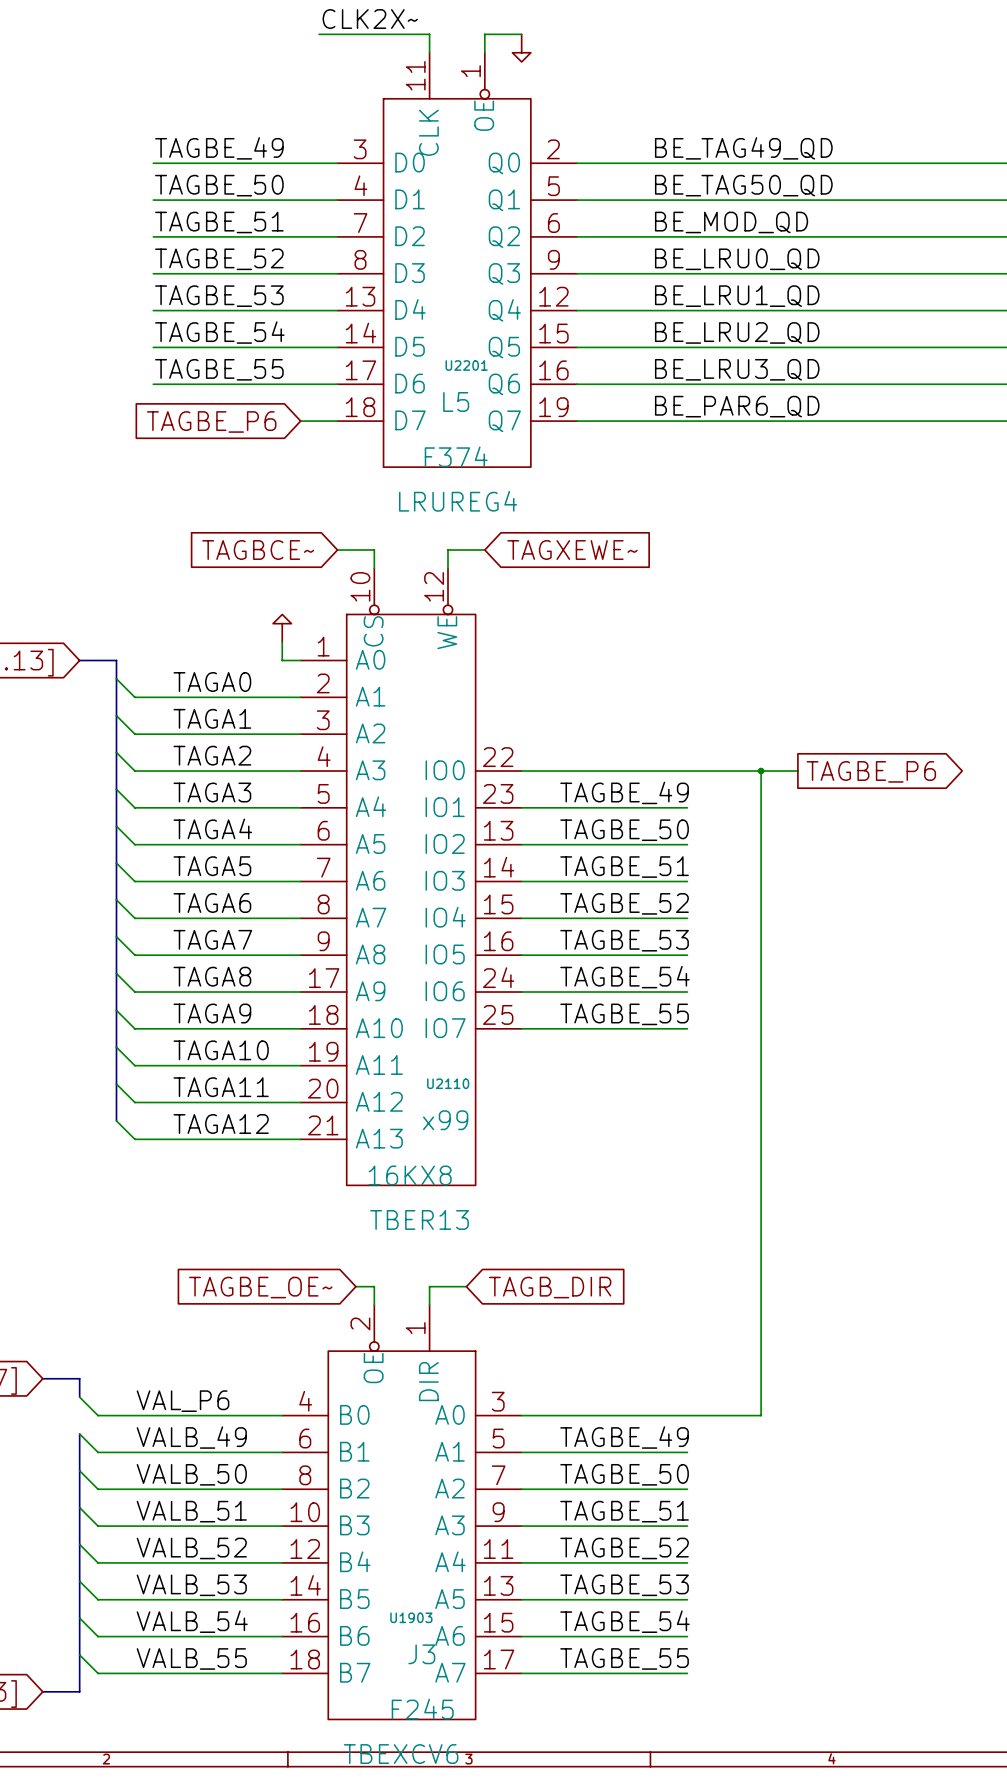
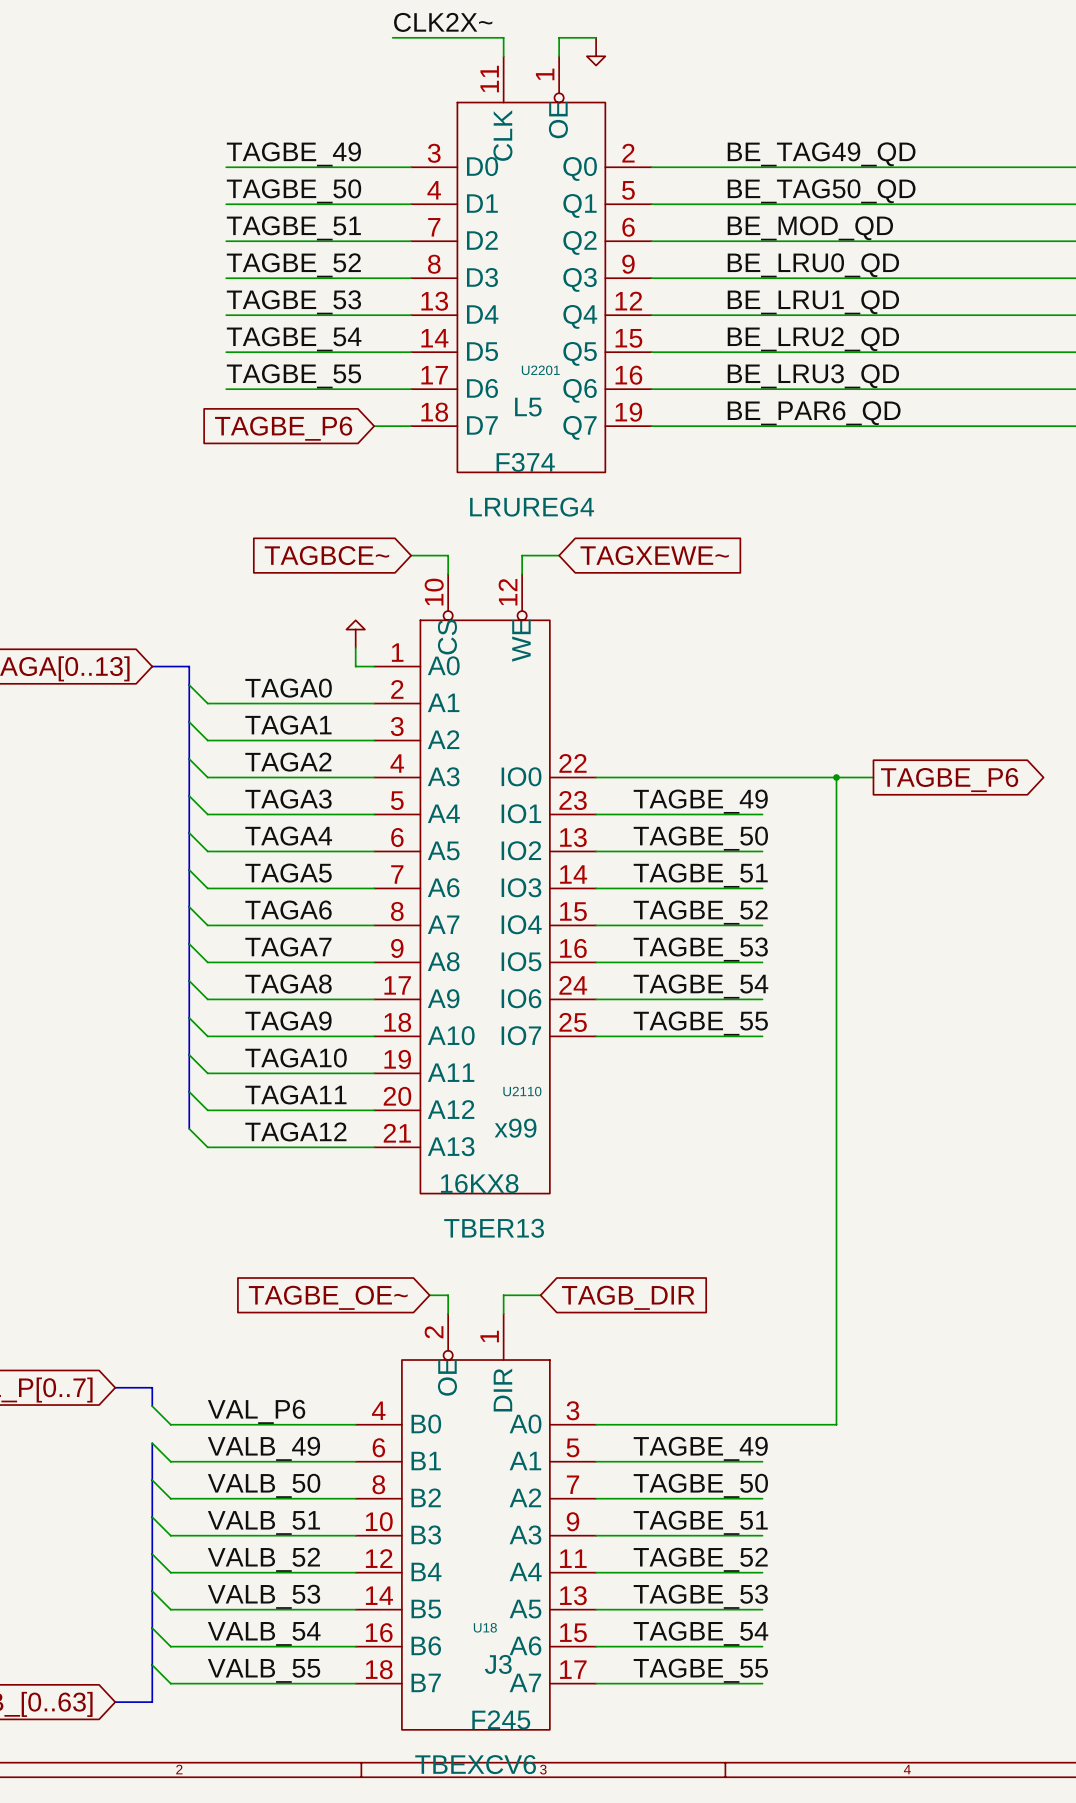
U1903 name: U1903 (411, 1617) -> U18 (485, 1627)

